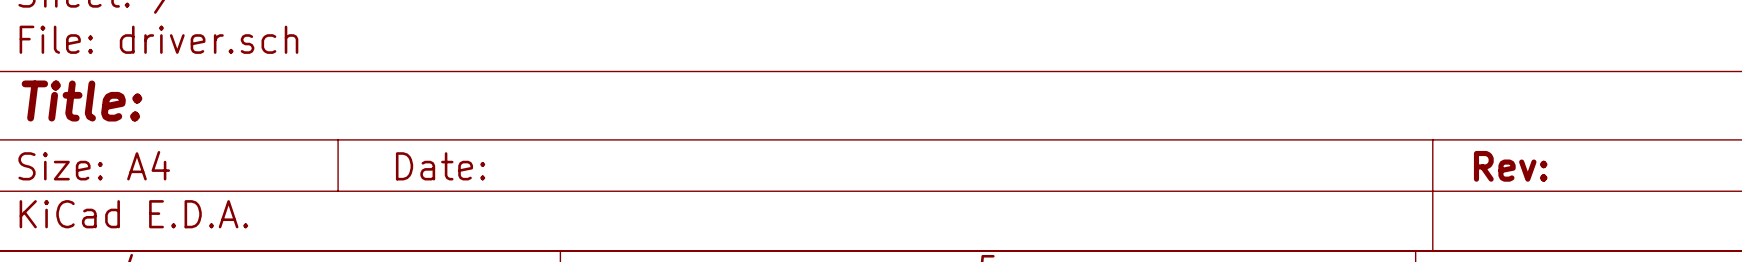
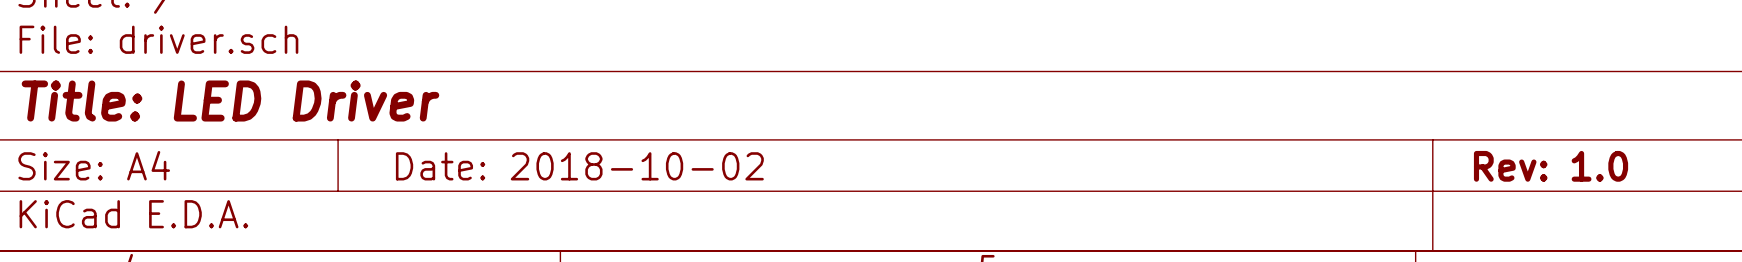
title block: Title: (82, 101) -> Title: LED Driver (230, 101)
title block: Date: (440, 166) -> Date: 2018-10-02 (579, 166)
title block: Rev: (1510, 166) -> Rev: 1.0 (1551, 166)

